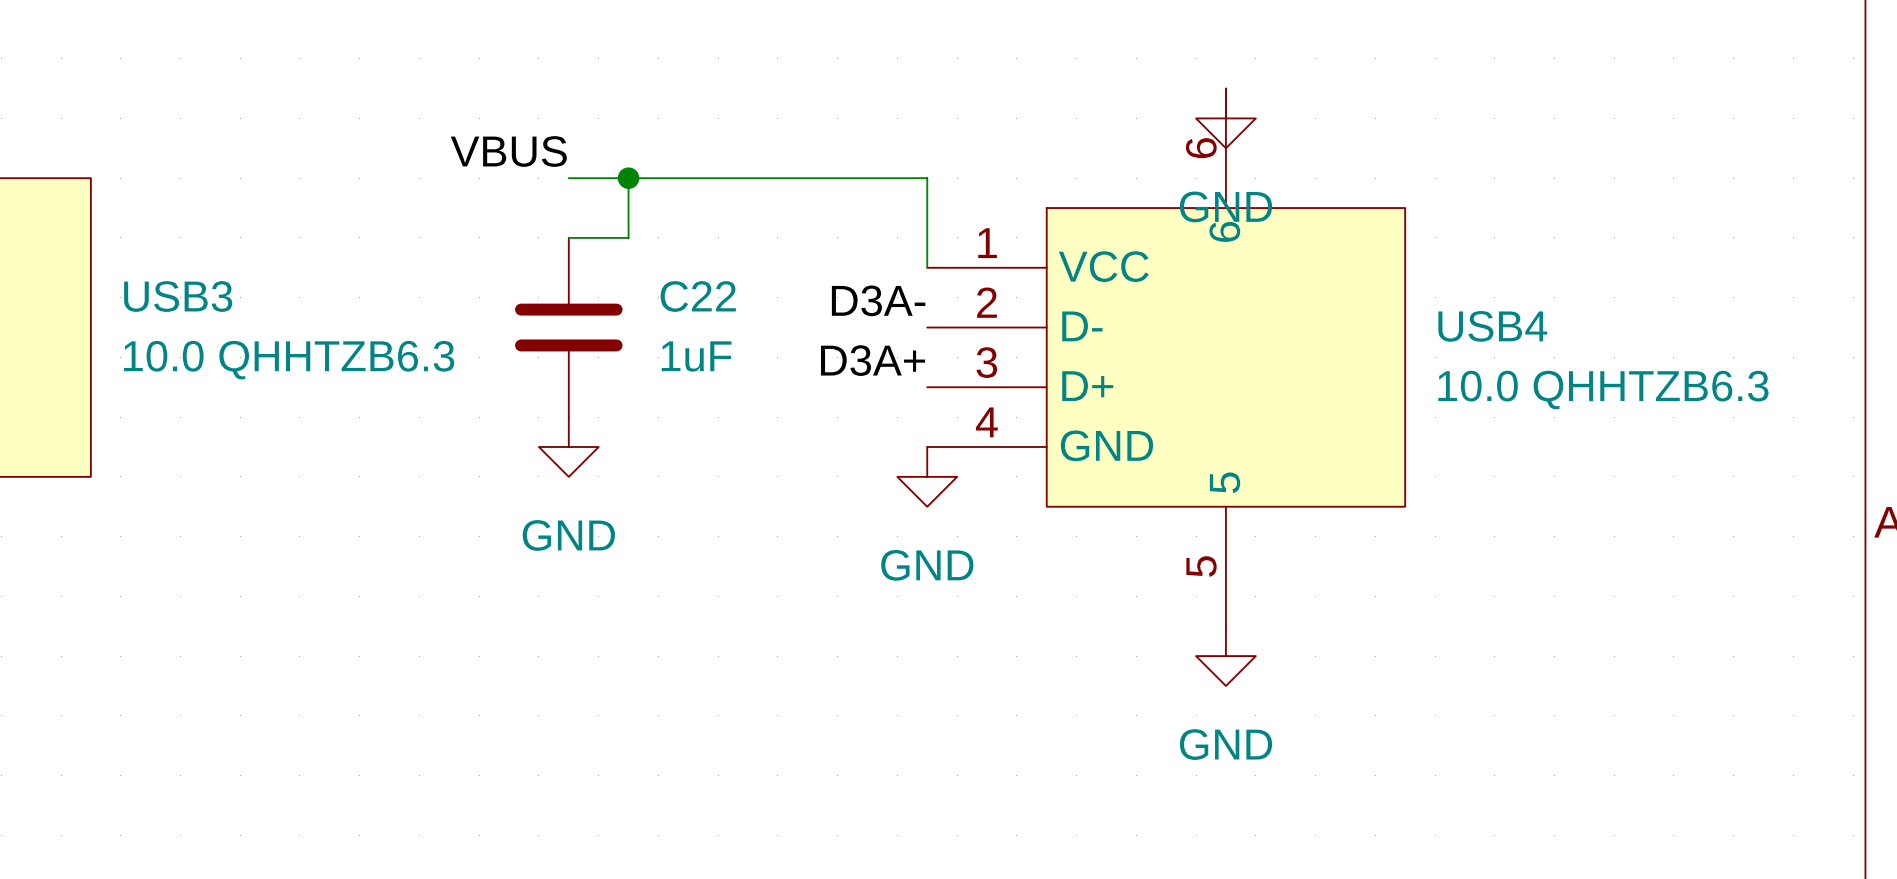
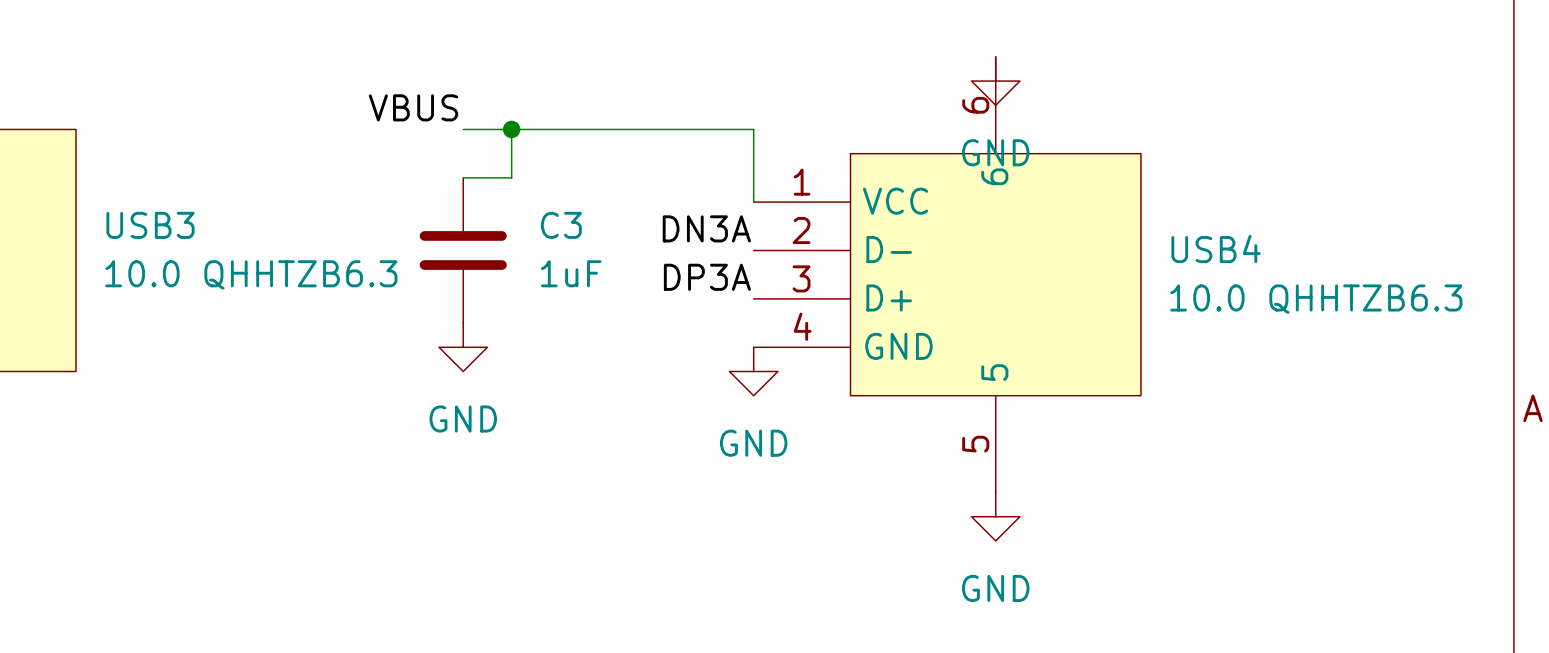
C22 name: C22 (698, 296) -> C3 (561, 225)
label: D3A- (878, 300) -> DN3A (706, 228)
label: D3A+ (873, 360) -> DP3A (707, 277)

